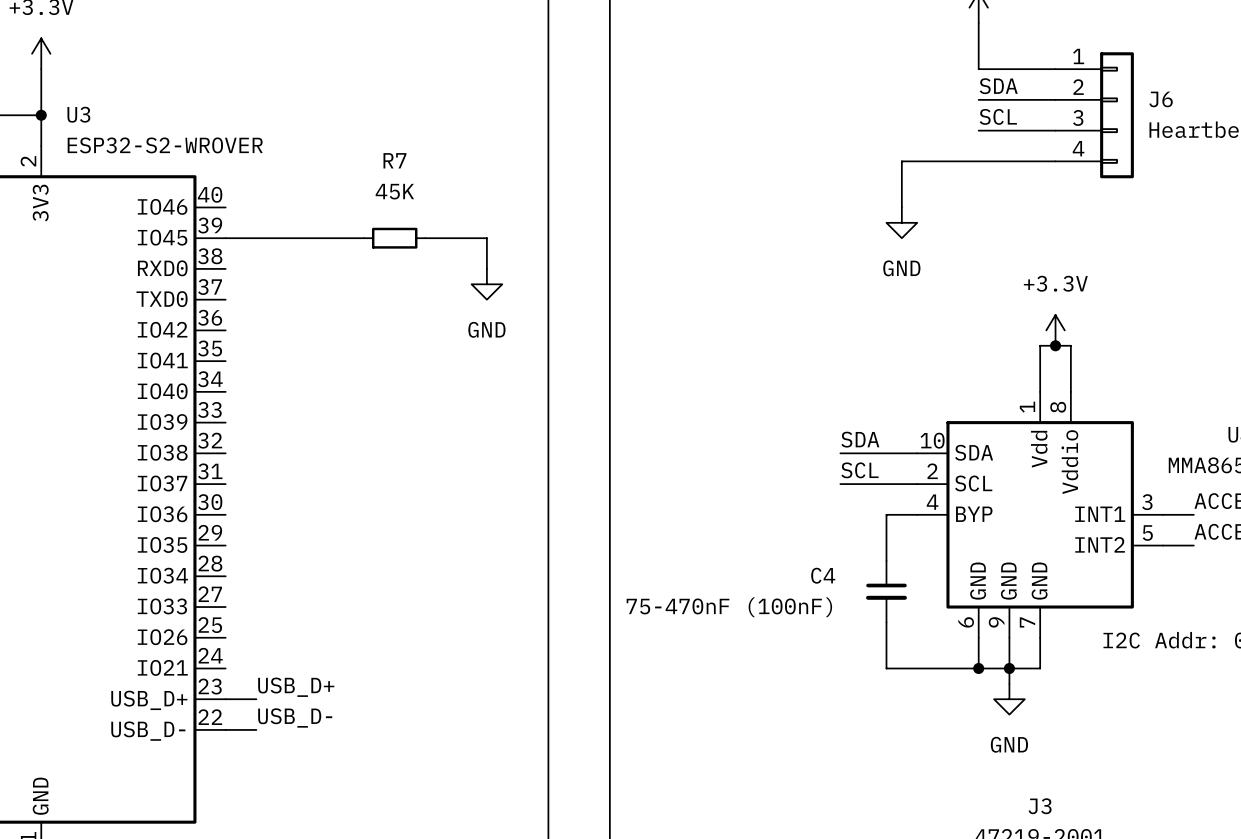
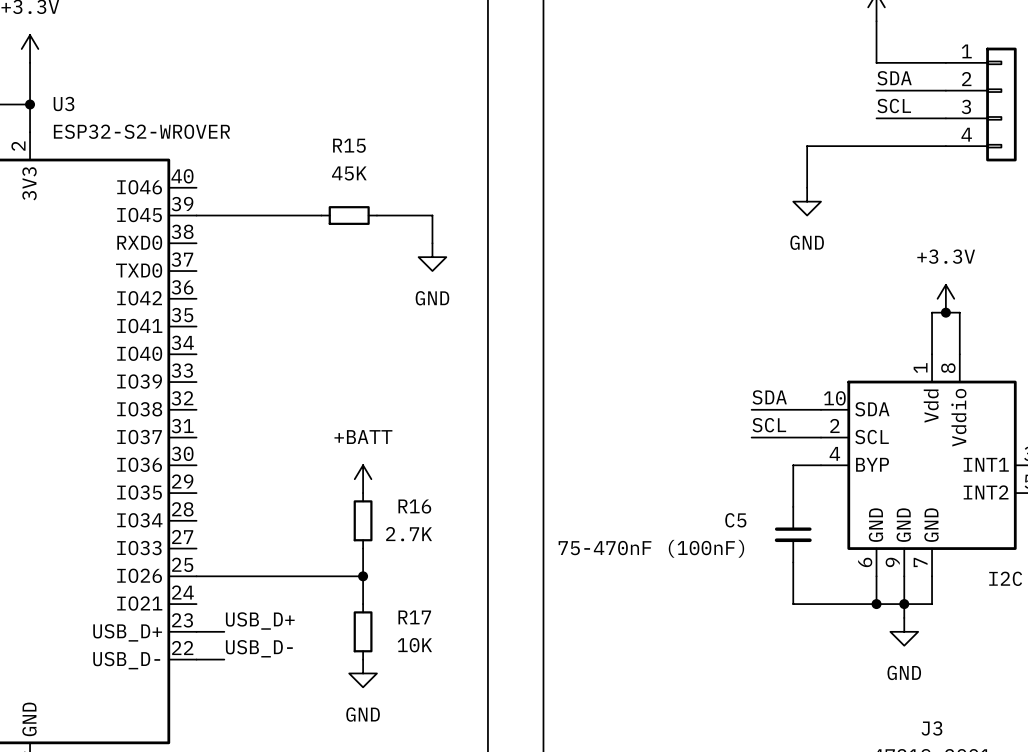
R7 name: R7 (394, 160) -> R15 (349, 145)
power symbol: none -> +BATT (363, 479)
C4 name: C4 (823, 575) -> C5 (735, 520)
R16: none -> 2.7K (363, 520)
wire: none -> (363, 548) (363, 604)
wire: none -> (196, 576) (363, 576)
junction: none -> (363, 576)
R17: none -> 10K (363, 631)
power symbol: none -> GND (363, 673)

